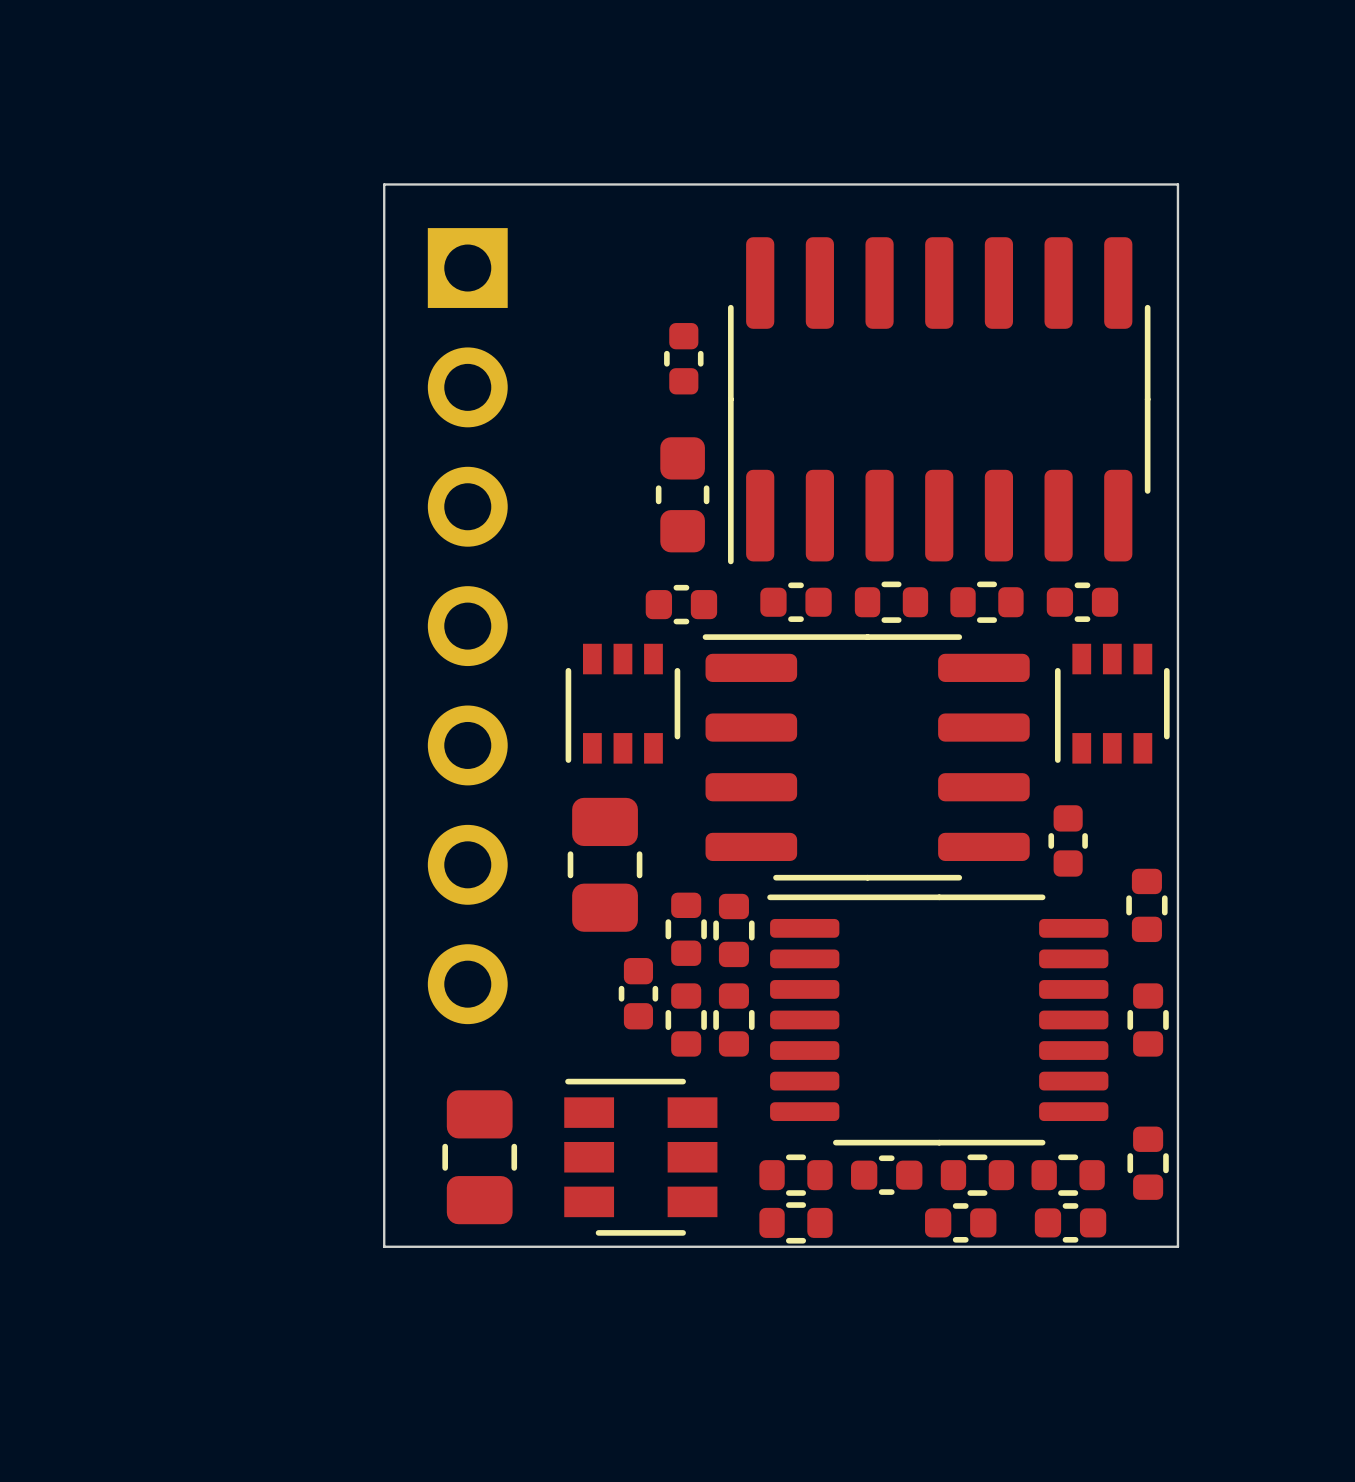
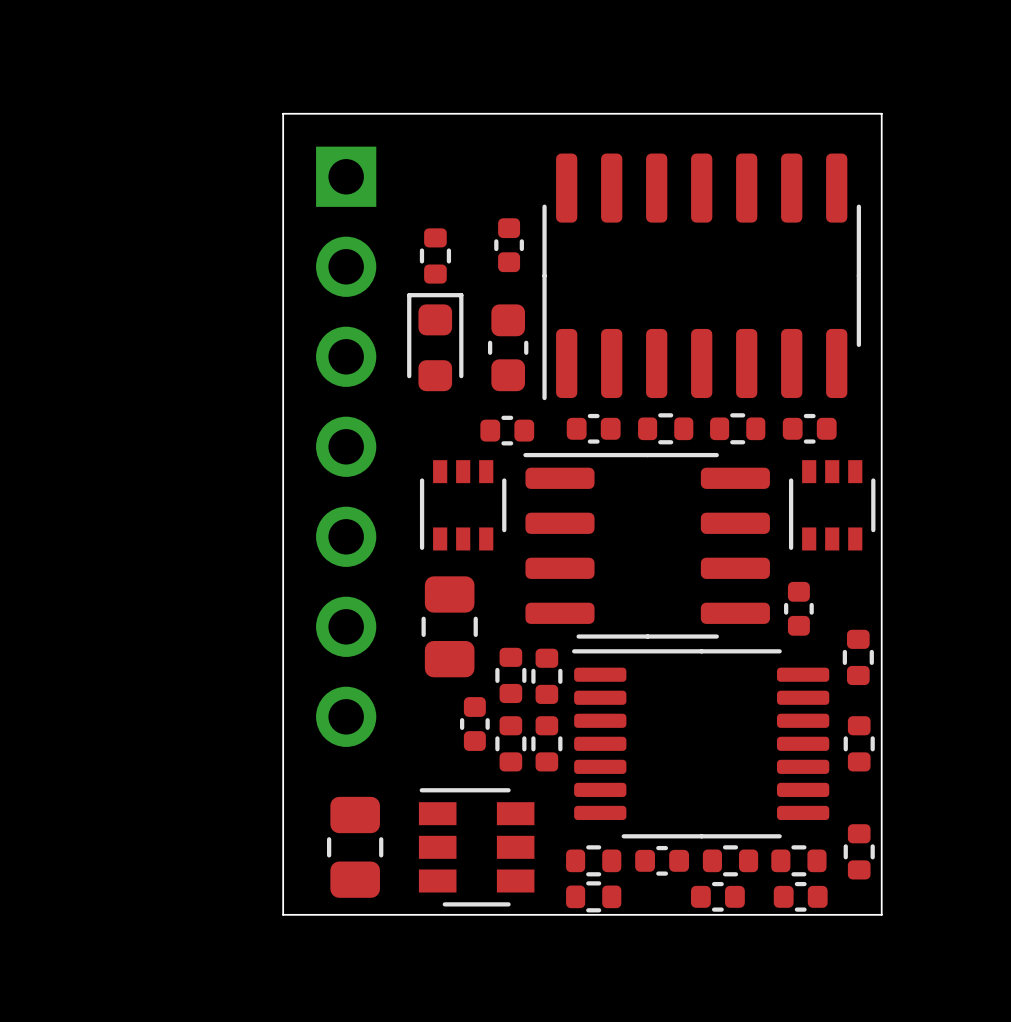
part: none -> (435, 255)
part: none -> (435, 342)

